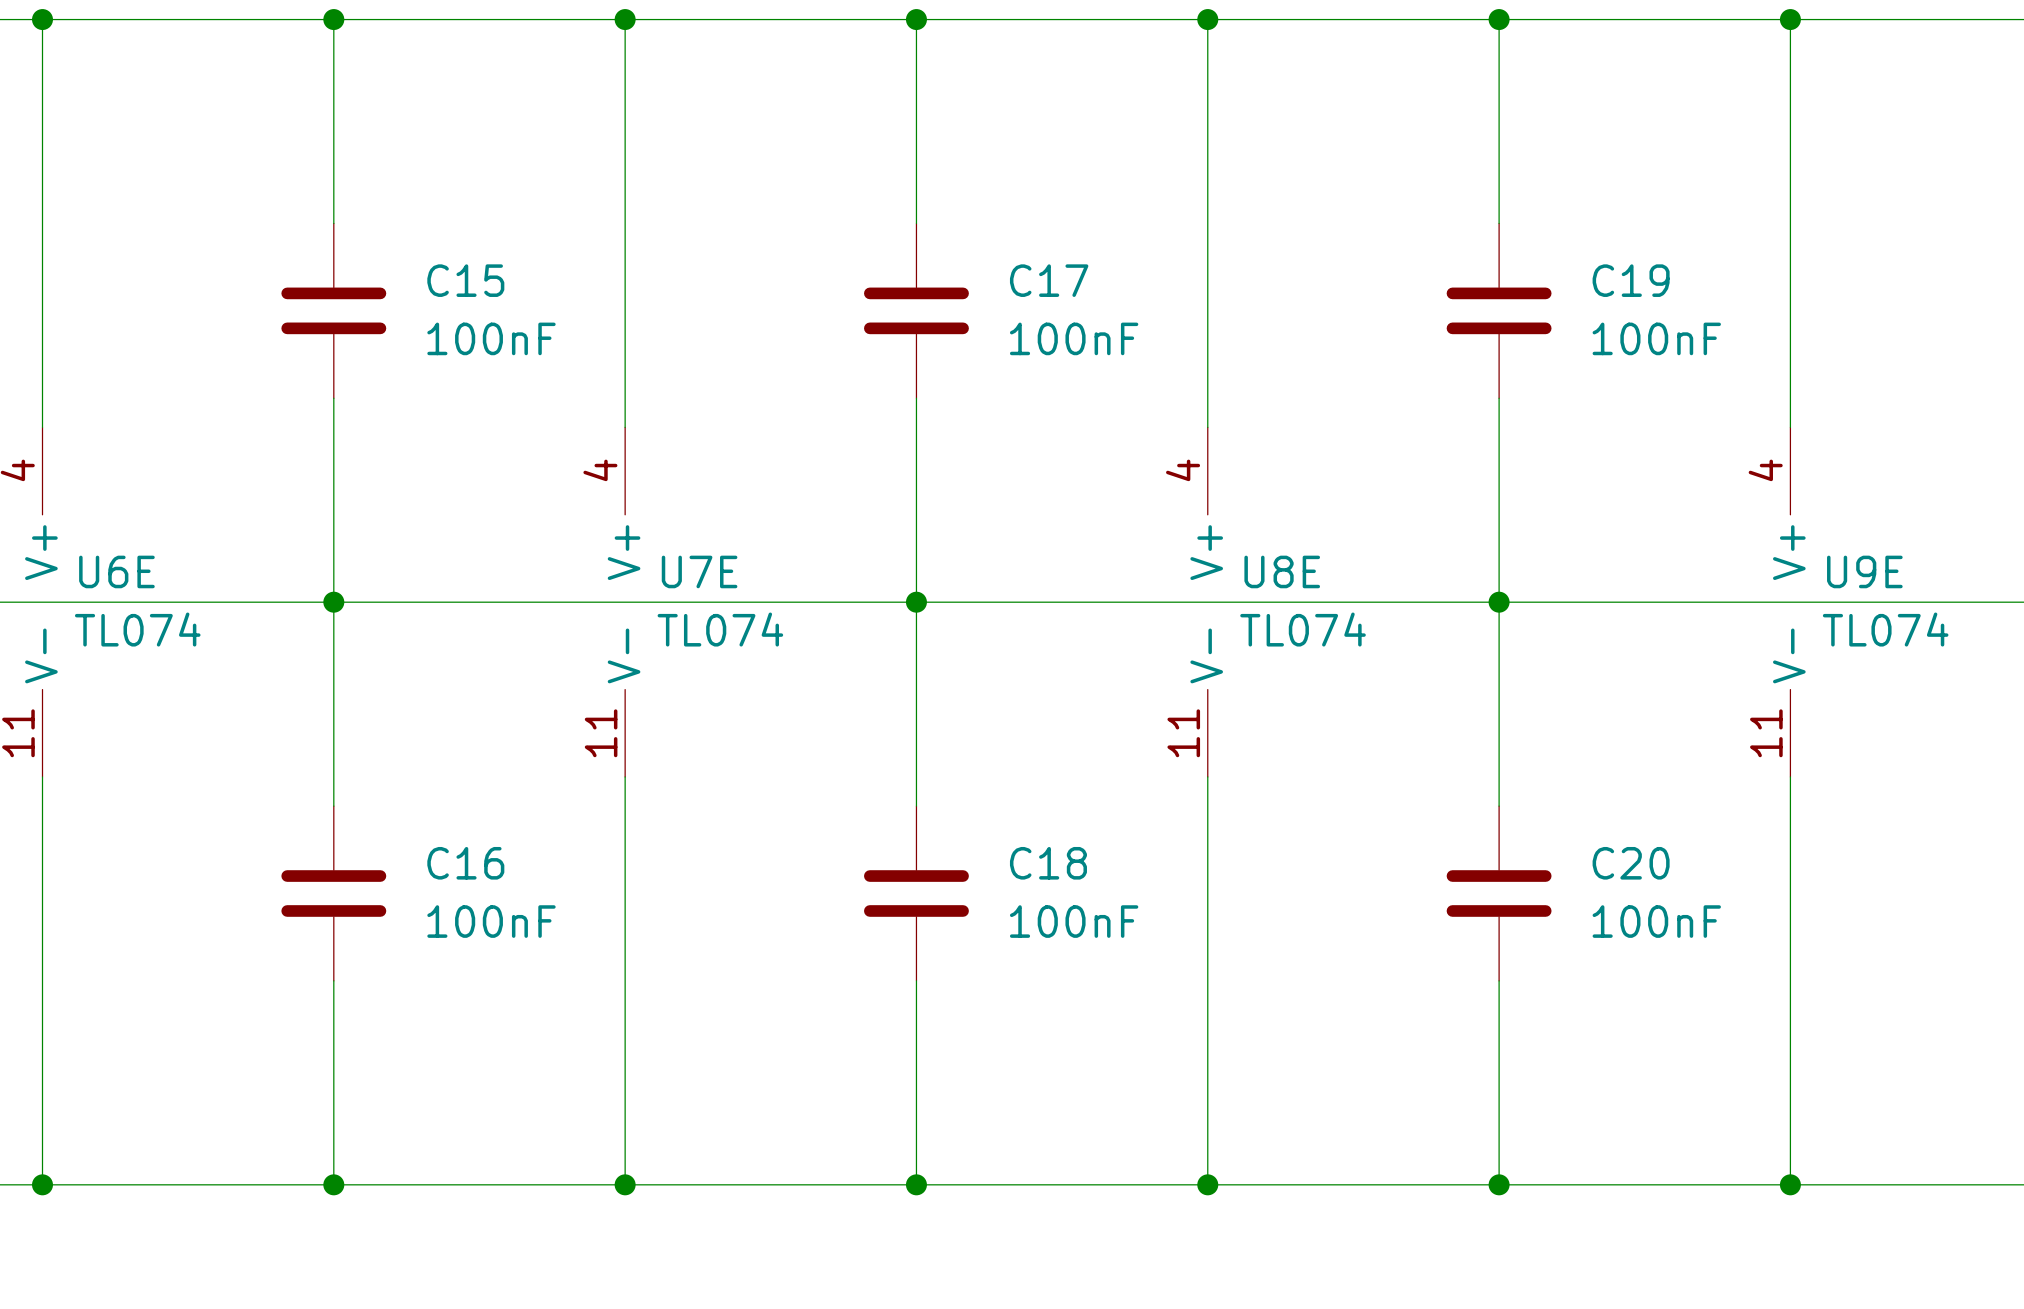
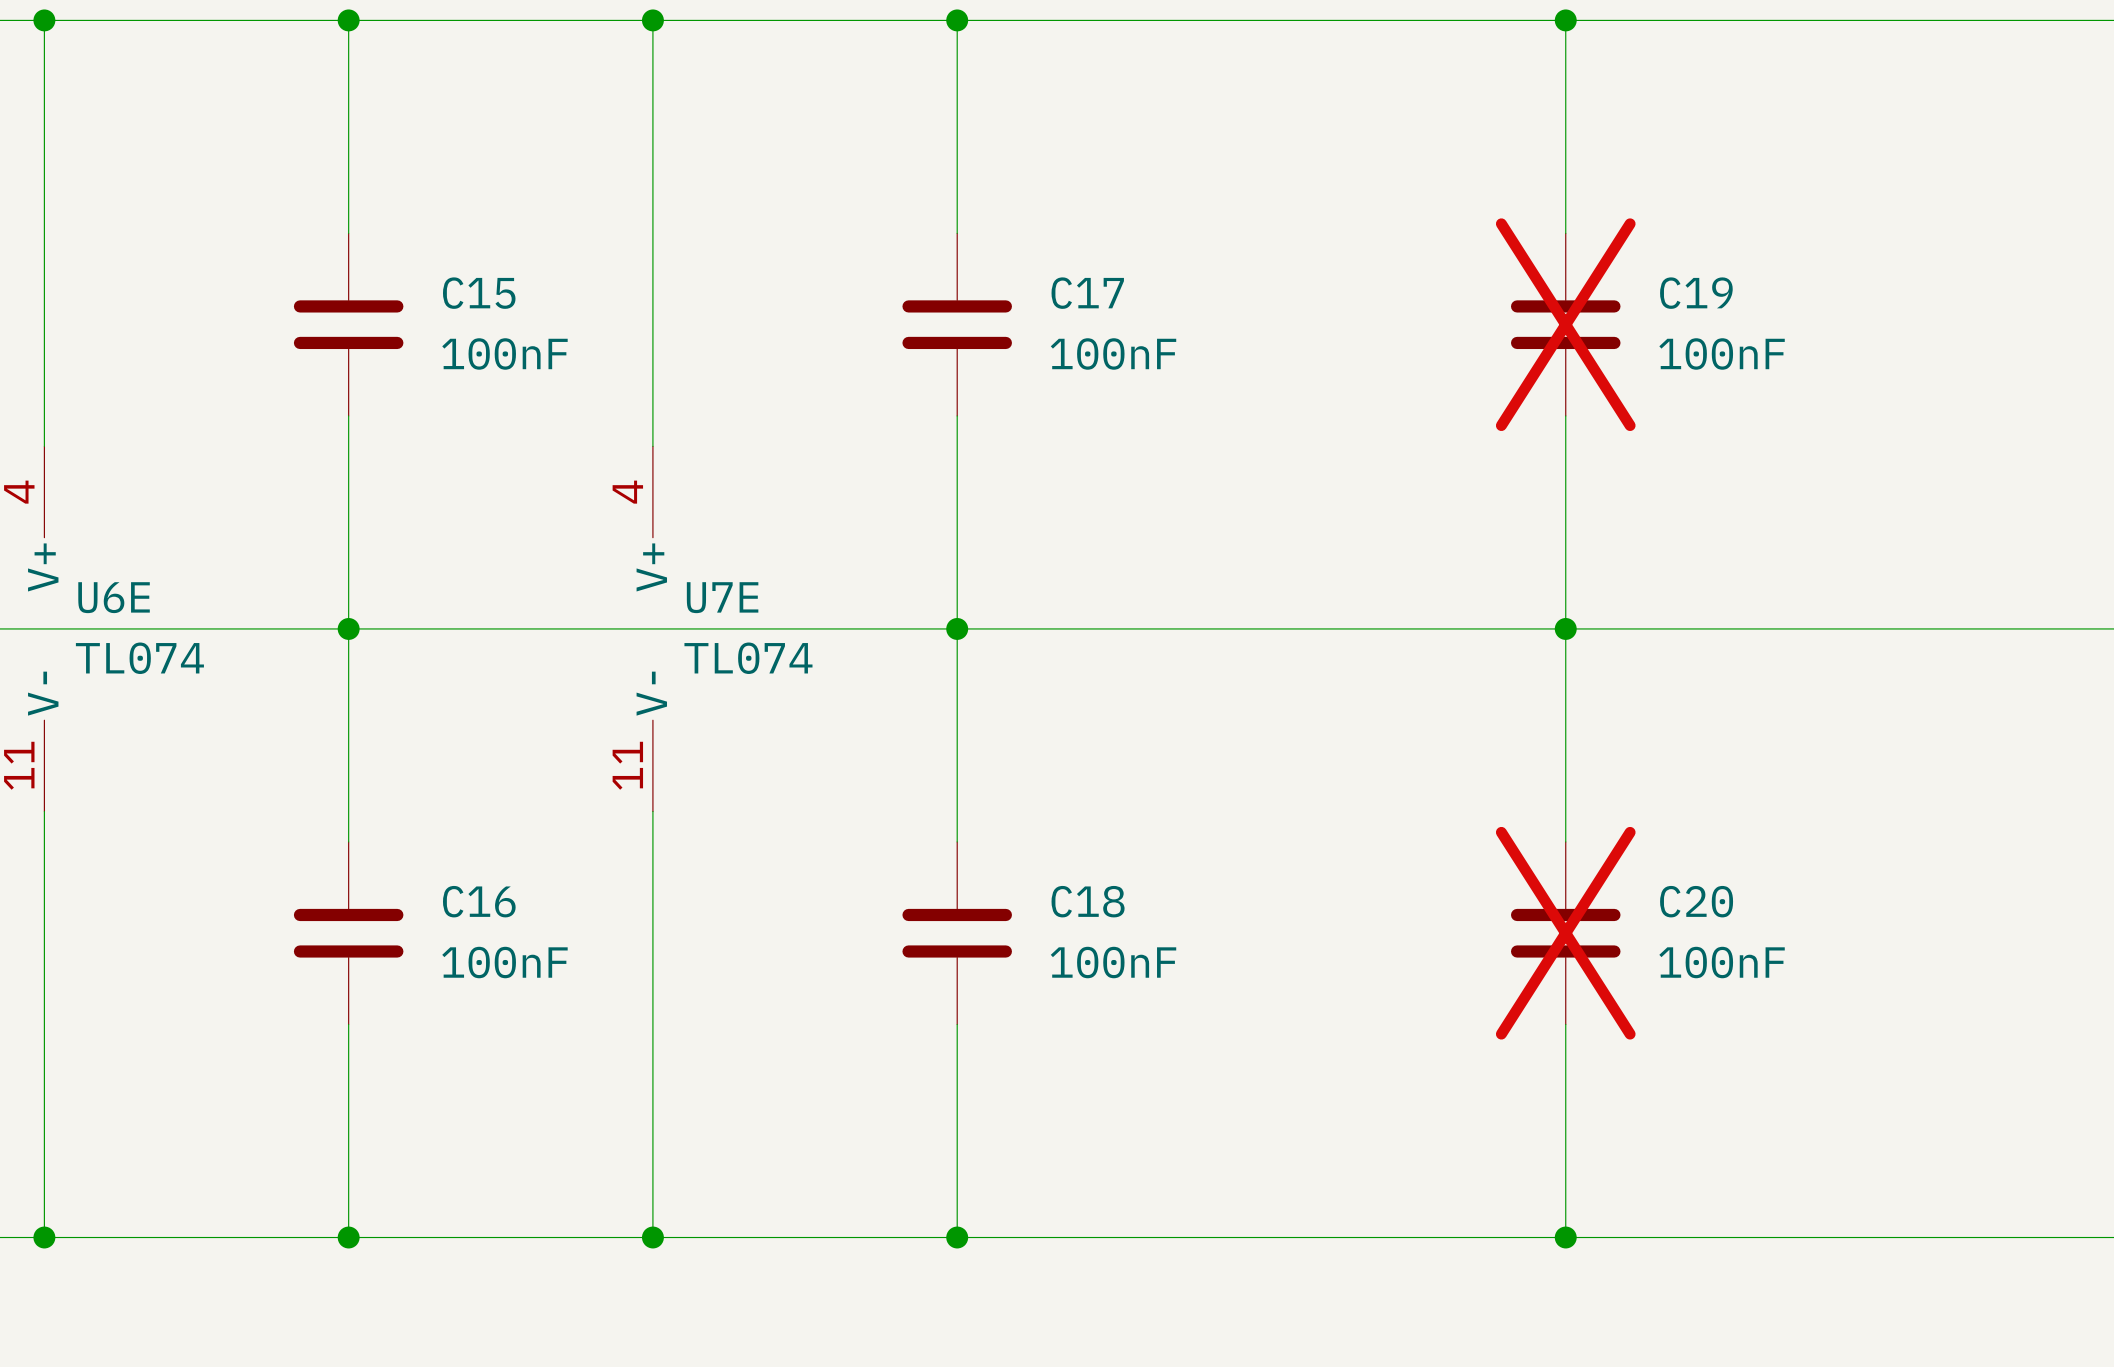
wire: (1207, 19) (1207, 427) -> none
junction: (1207, 19) -> none
wire: (1790, 19) (1790, 427) -> none
junction: (1790, 19) -> none
C19 do-not-place cross: none -> (1565, 324)
U8E: TL074 (1207, 602) -> none
U9E: TL074 (1790, 602) -> none
wire: (1207, 776) (1207, 1184) -> none
wire: (1790, 776) (1790, 1184) -> none
C20 do-not-place cross: none -> (1565, 933)
junction: (1207, 1184) -> none
junction: (1790, 1184) -> none

